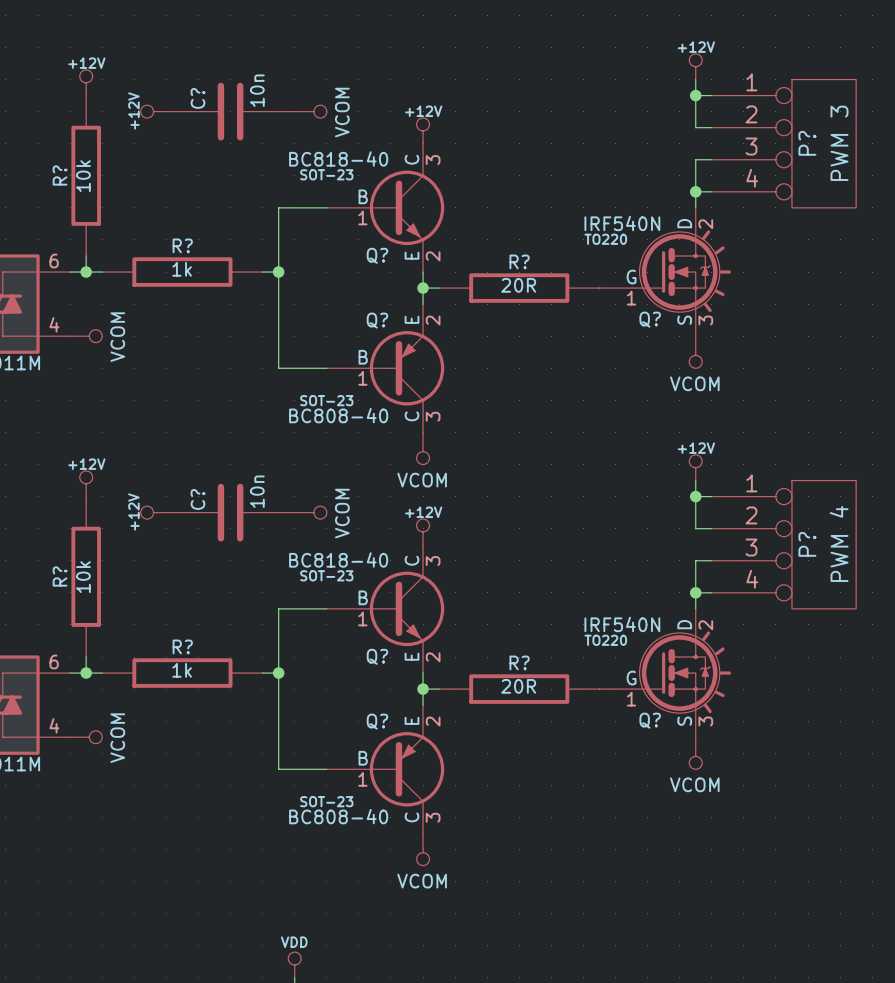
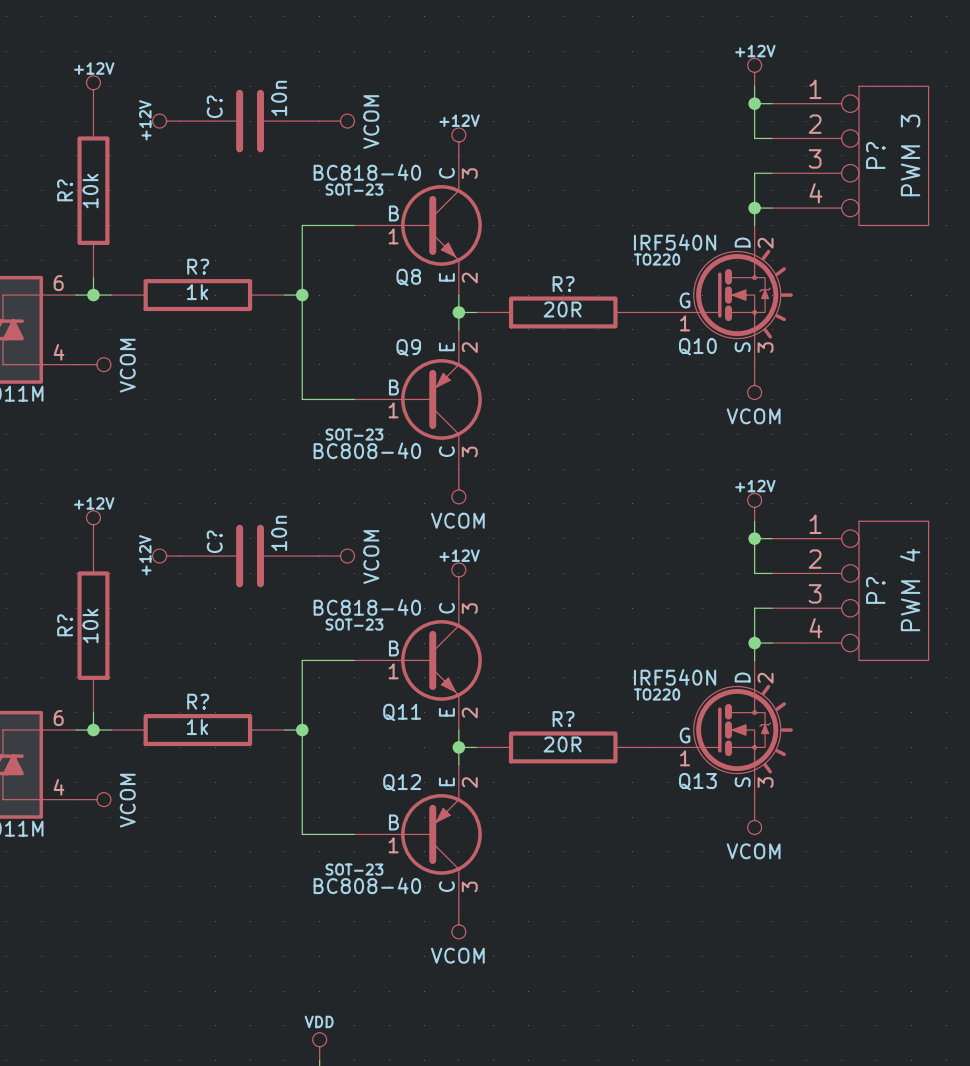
Q? name: Q? (377, 255) -> Q8 (408, 277)
Q? name: Q? (650, 319) -> Q10 (697, 346)
Q? name: Q? (377, 320) -> Q9 (408, 347)
Q? name: Q? (377, 656) -> Q11 (402, 712)
Q? name: Q? (650, 720) -> Q13 (697, 781)
Q? name: Q? (377, 721) -> Q12 (402, 782)

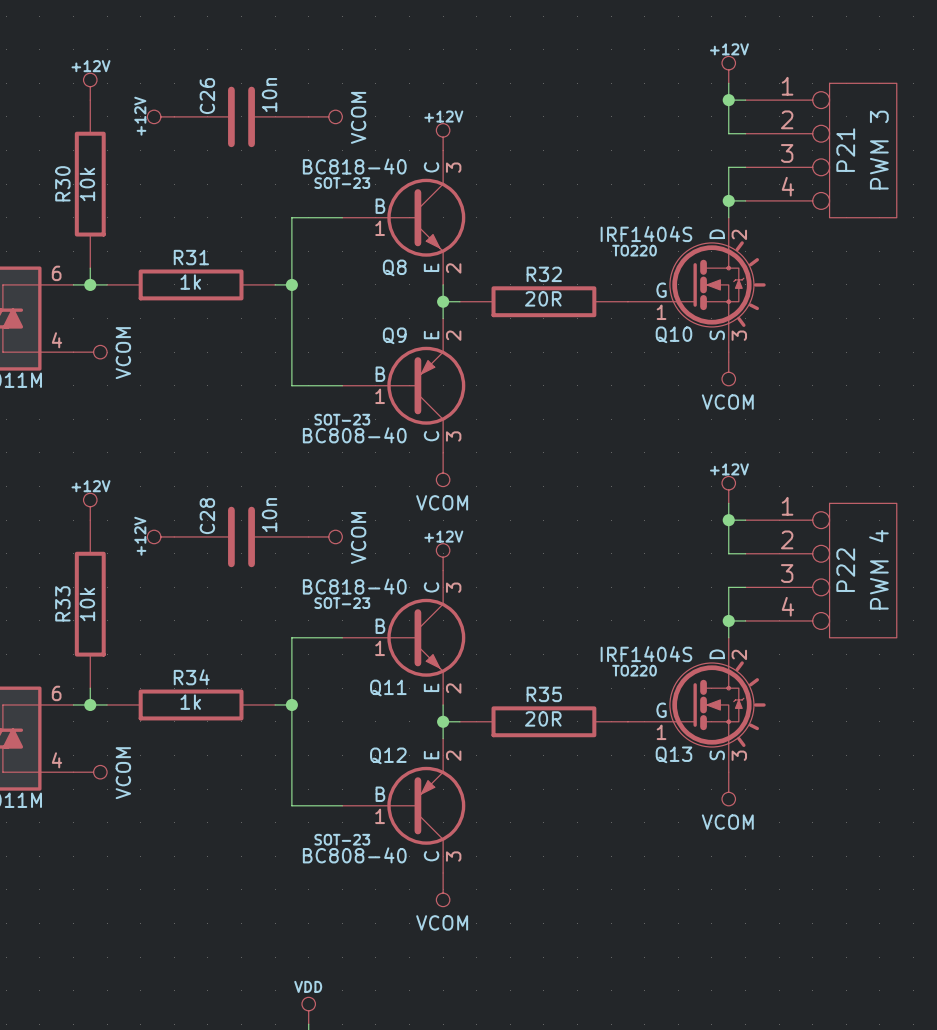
C? name: C? (214, 106) -> C26 (207, 96)
P? name: P? (875, 155) -> P21 (845, 150)
R? name: R? (65, 190) -> R30 (62, 183)
Q10 value: IRF540N (675, 242) -> IRF1404S (646, 234)
R? name: R? (198, 266) -> R31 (191, 257)
R? name: R? (563, 284) -> R32 (544, 274)
C? name: C? (214, 541) -> C28 (207, 516)
P? name: P? (875, 590) -> P22 (845, 570)
R? name: R? (65, 625) -> R33 (62, 603)
Q13 value: IRF540N (675, 677) -> IRF1404S (646, 654)
R? name: R? (198, 701) -> R34 (191, 677)
R? name: R? (563, 719) -> R35 (544, 694)

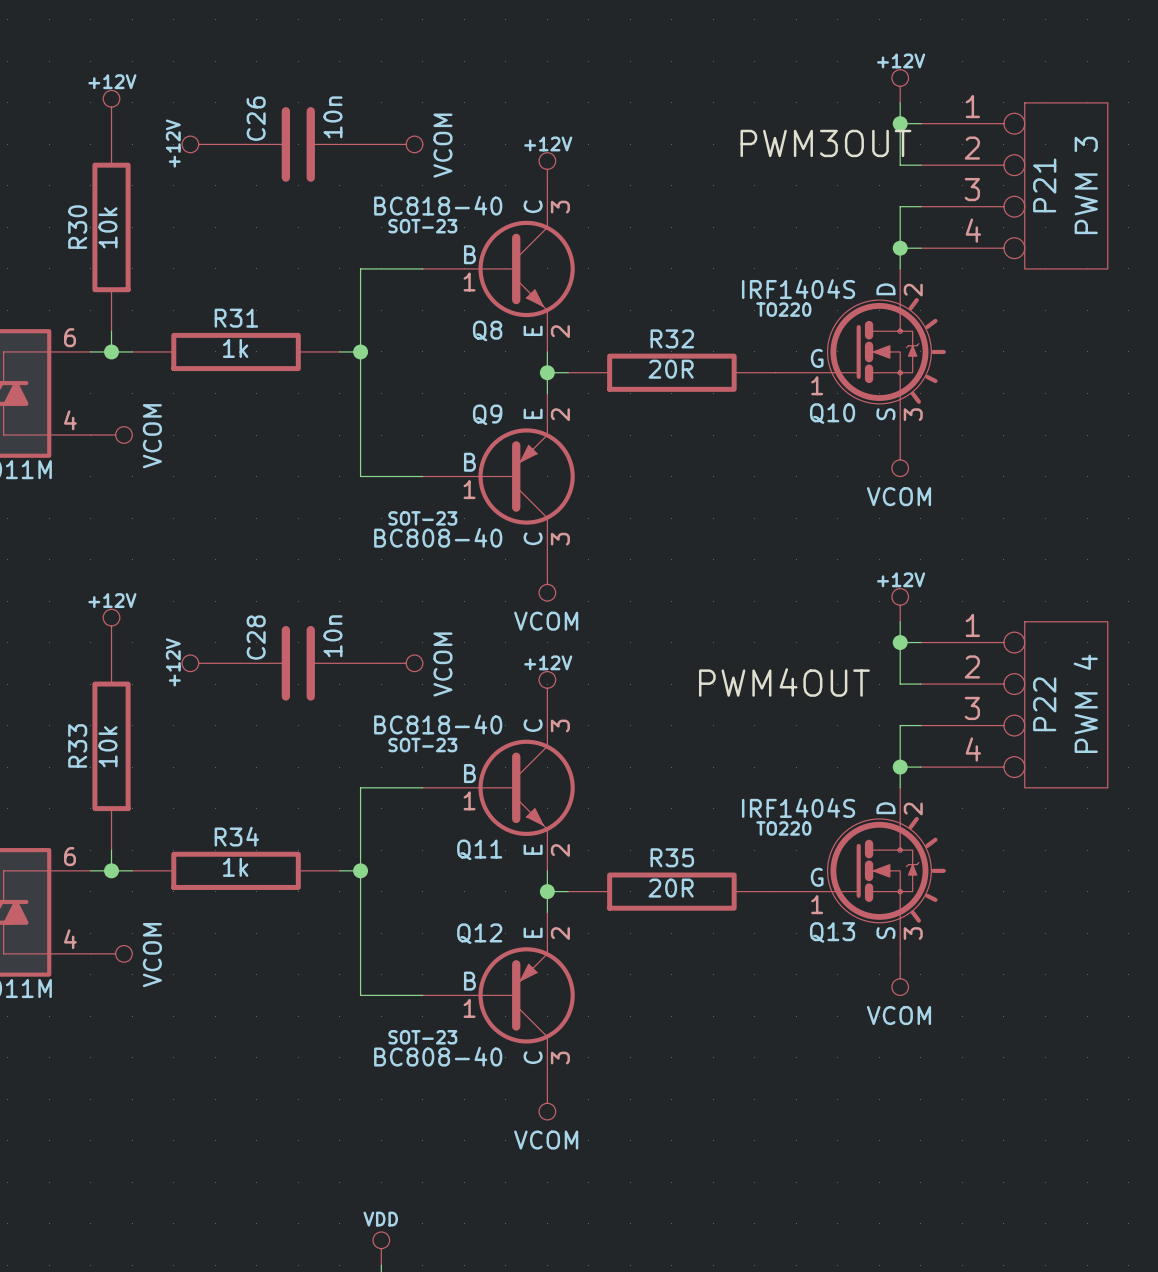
label: none -> PWM3OUT (825, 143)
label: none -> PWM4OUT (784, 682)

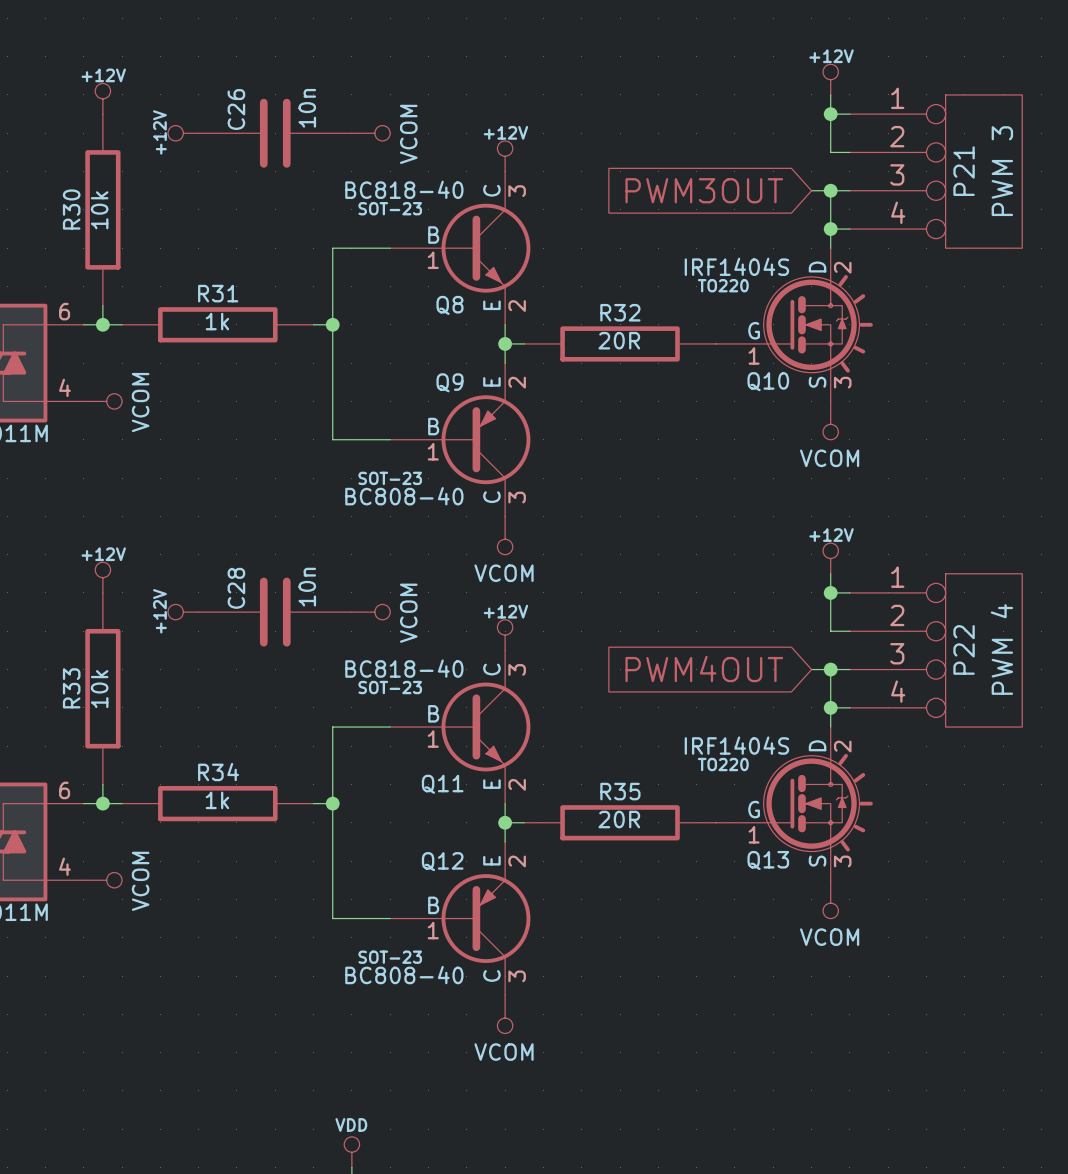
label: PWM3OUT (825, 143) -> none
global label: none -> PWM3OUT (704, 190)
wire: none -> (811, 190) (830, 190)
junction: none -> (830, 190)
label: PWM4OUT (784, 682) -> none
global label: none -> PWM4OUT (704, 669)
wire: none -> (811, 669) (830, 669)
junction: none -> (830, 669)

